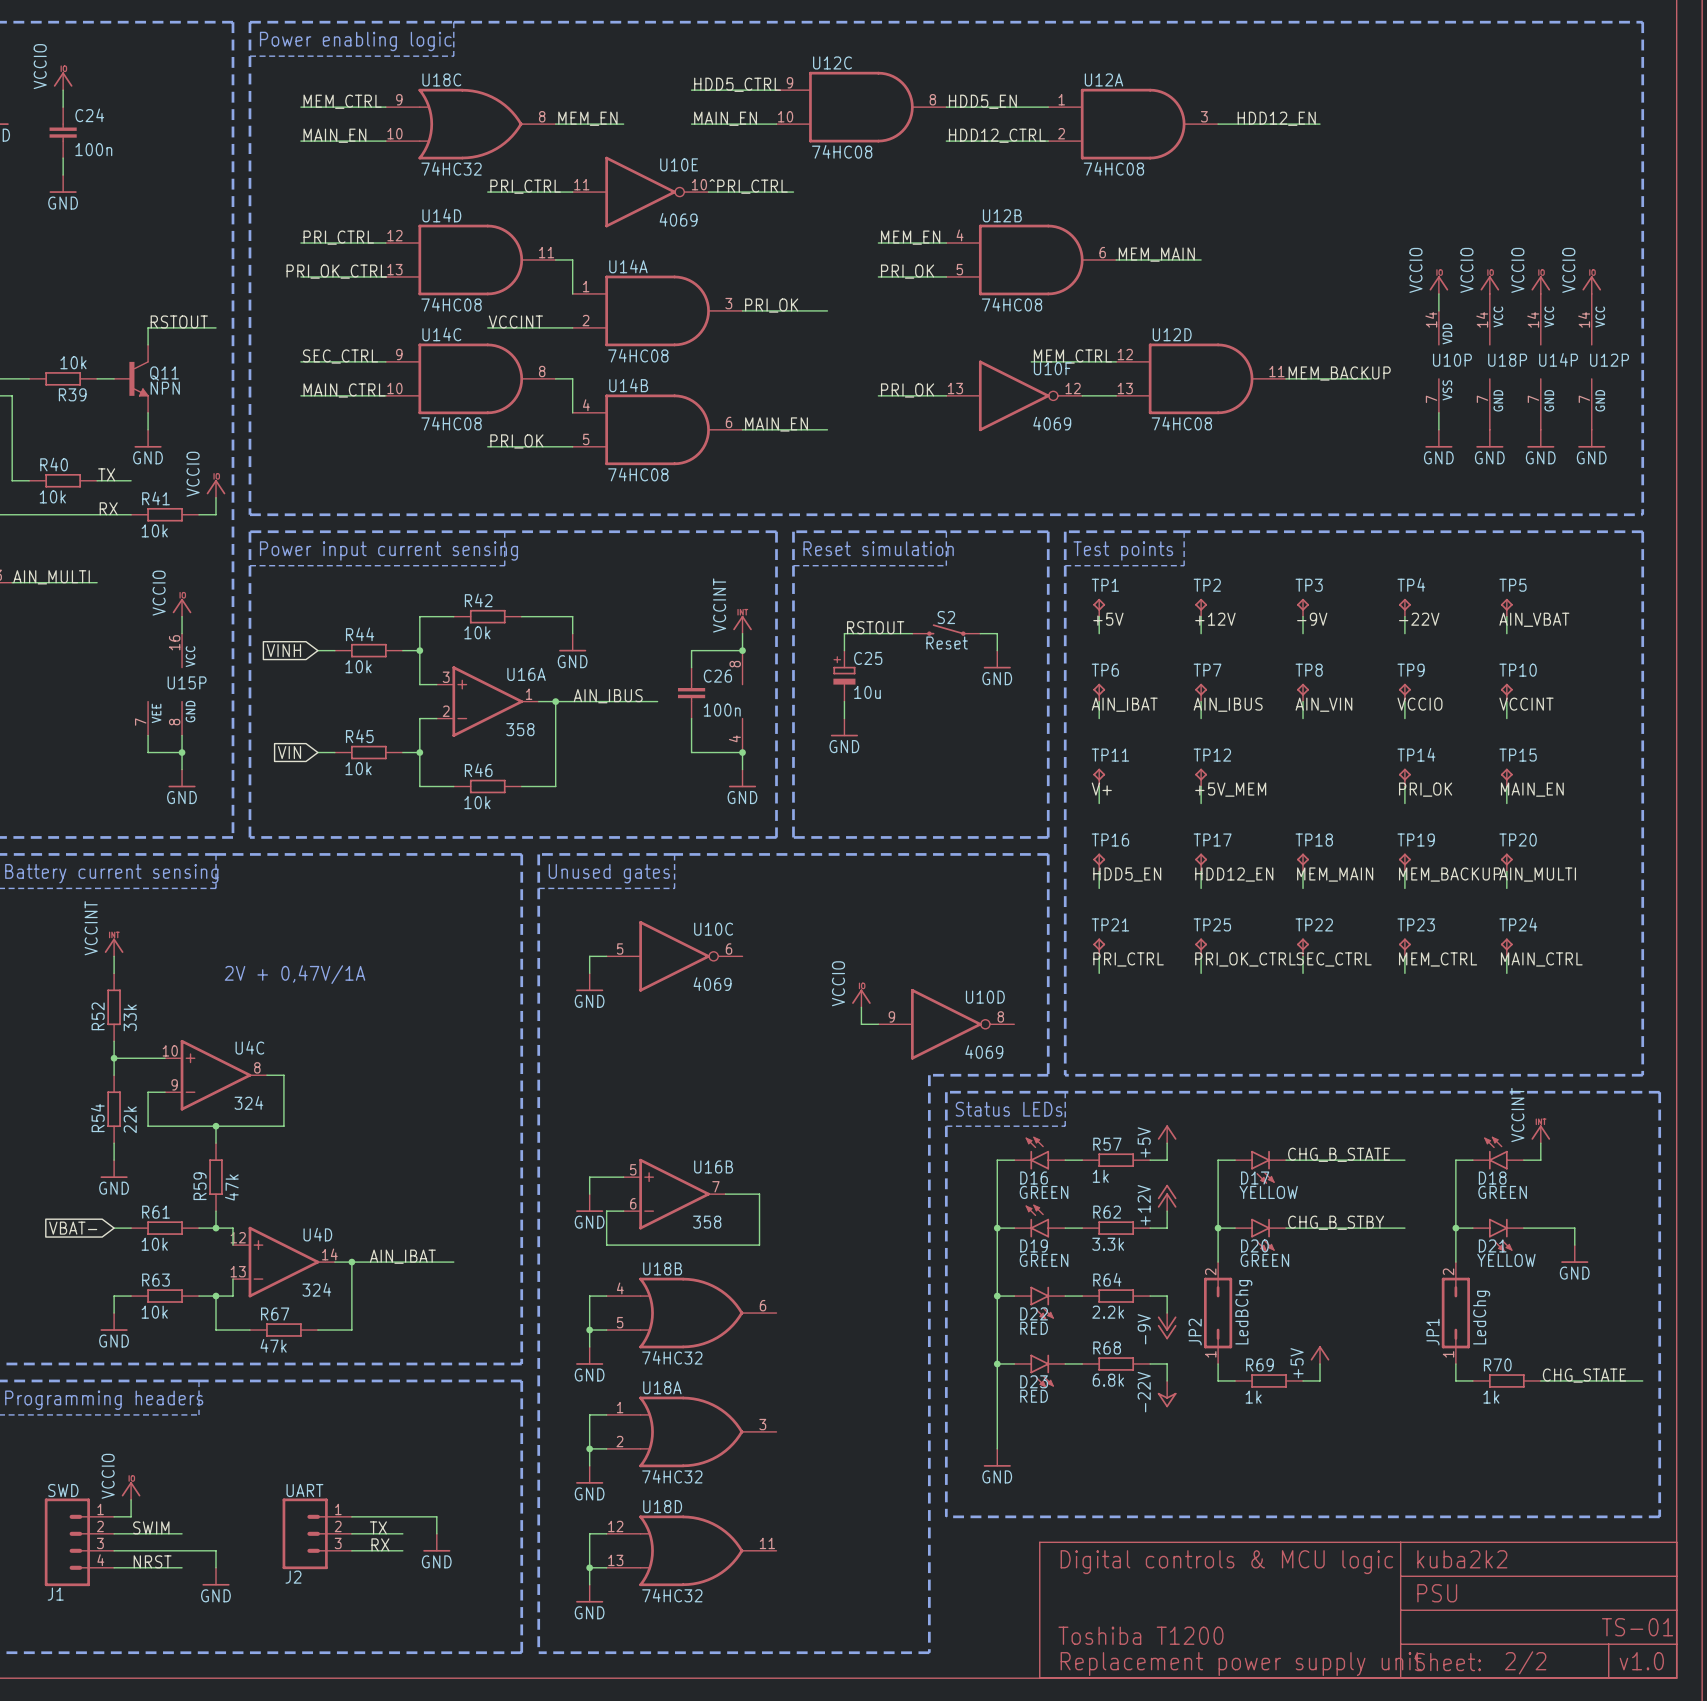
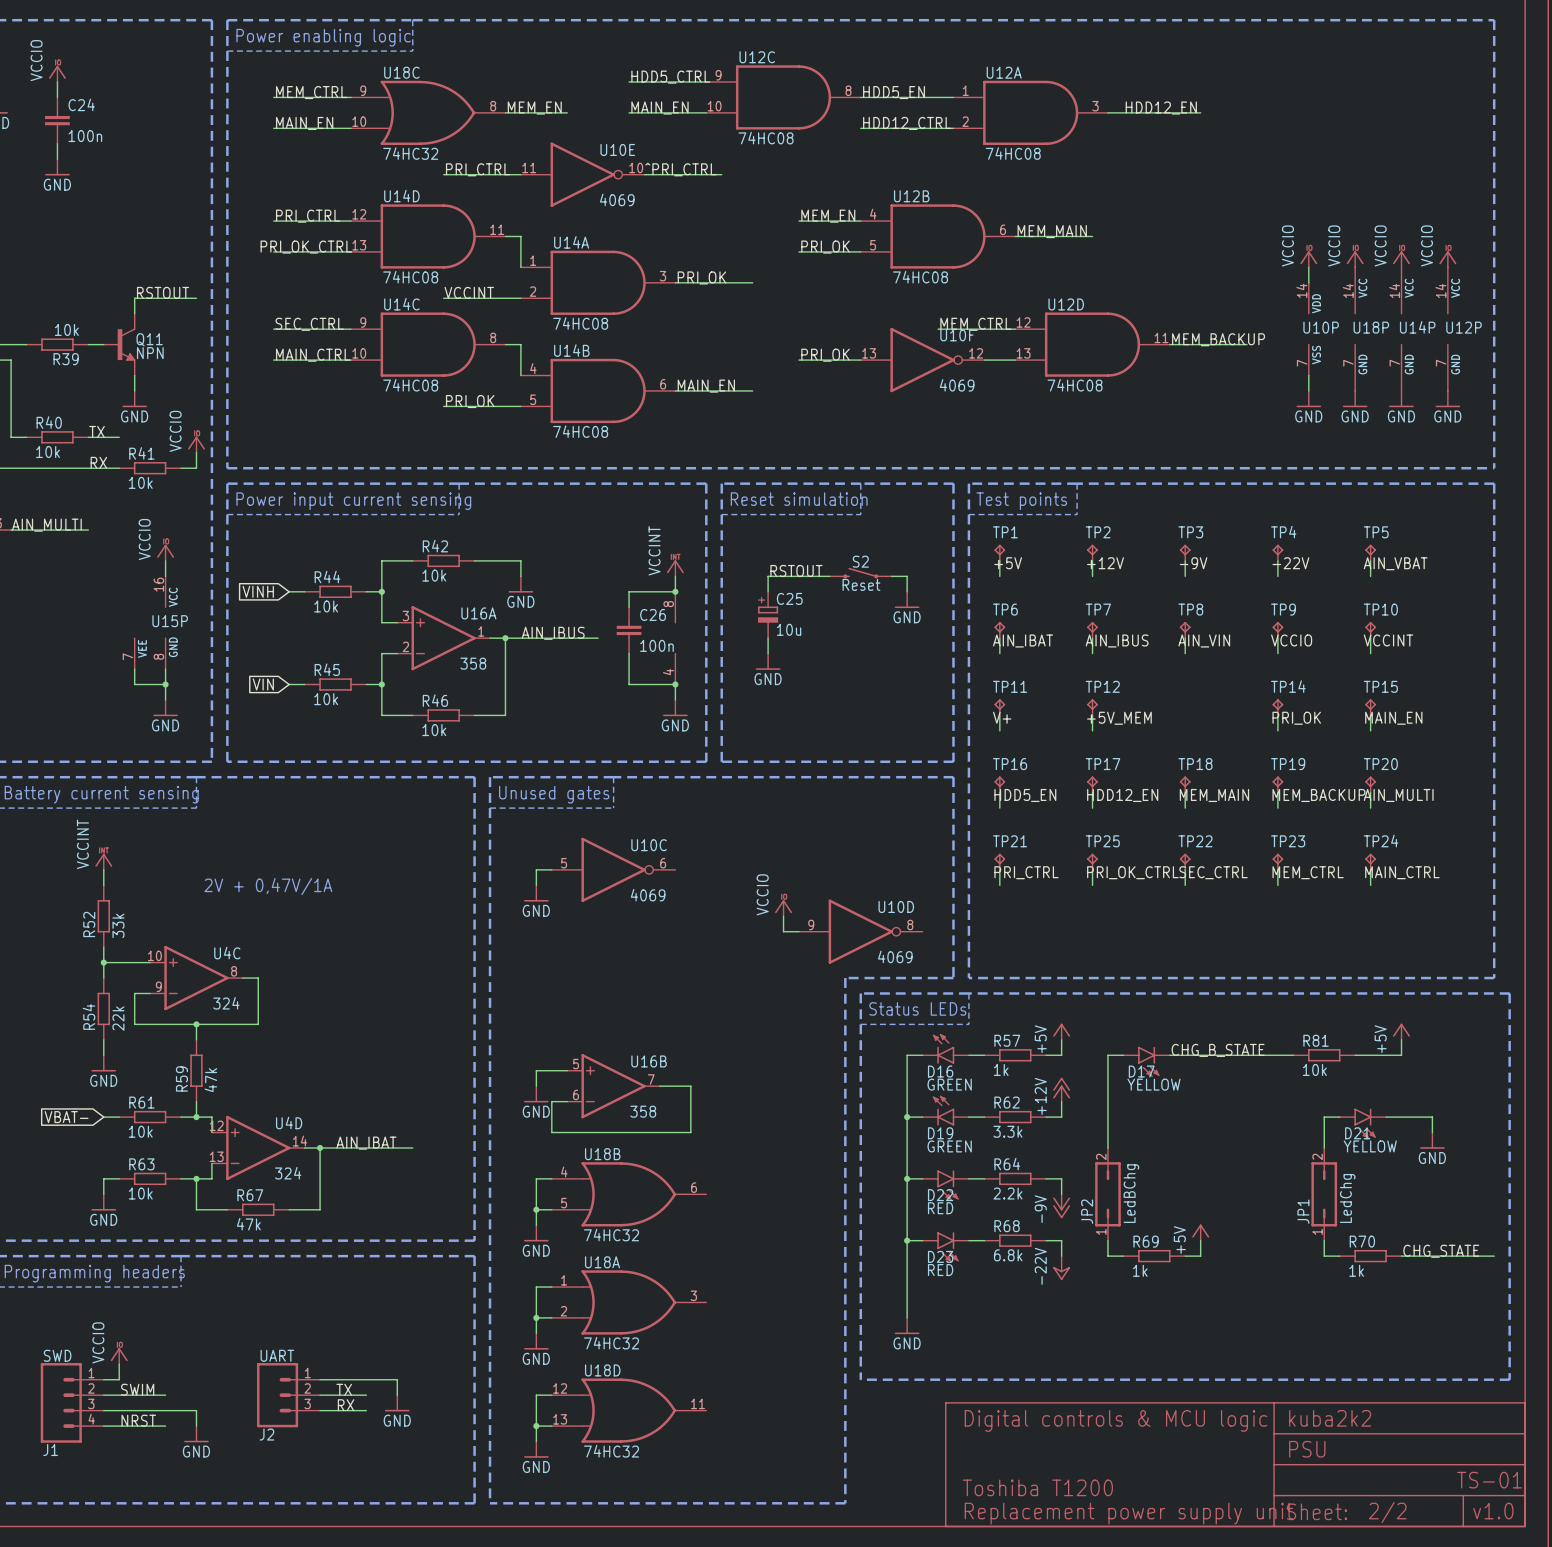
power symbol: VCCINT (1540, 1134) -> +5V (1401, 1031)
D18: GREEN (1498, 1153) -> none
wire: none -> (1277, 1055) (1293, 1055)
R81: none -> 10k (1324, 1055)
wire: (1472, 1160) (1455, 1160) (1455, 1228) -> none
label: CHG_B_STBY (1336, 1222) -> none
wire: (1218, 1228) (1235, 1228) -> none
junction: (1218, 1228) -> none
wire: (1286, 1228) (1404, 1228) -> none
junction: (1455, 1228) -> none
D20: GREEN (1260, 1235) -> none

